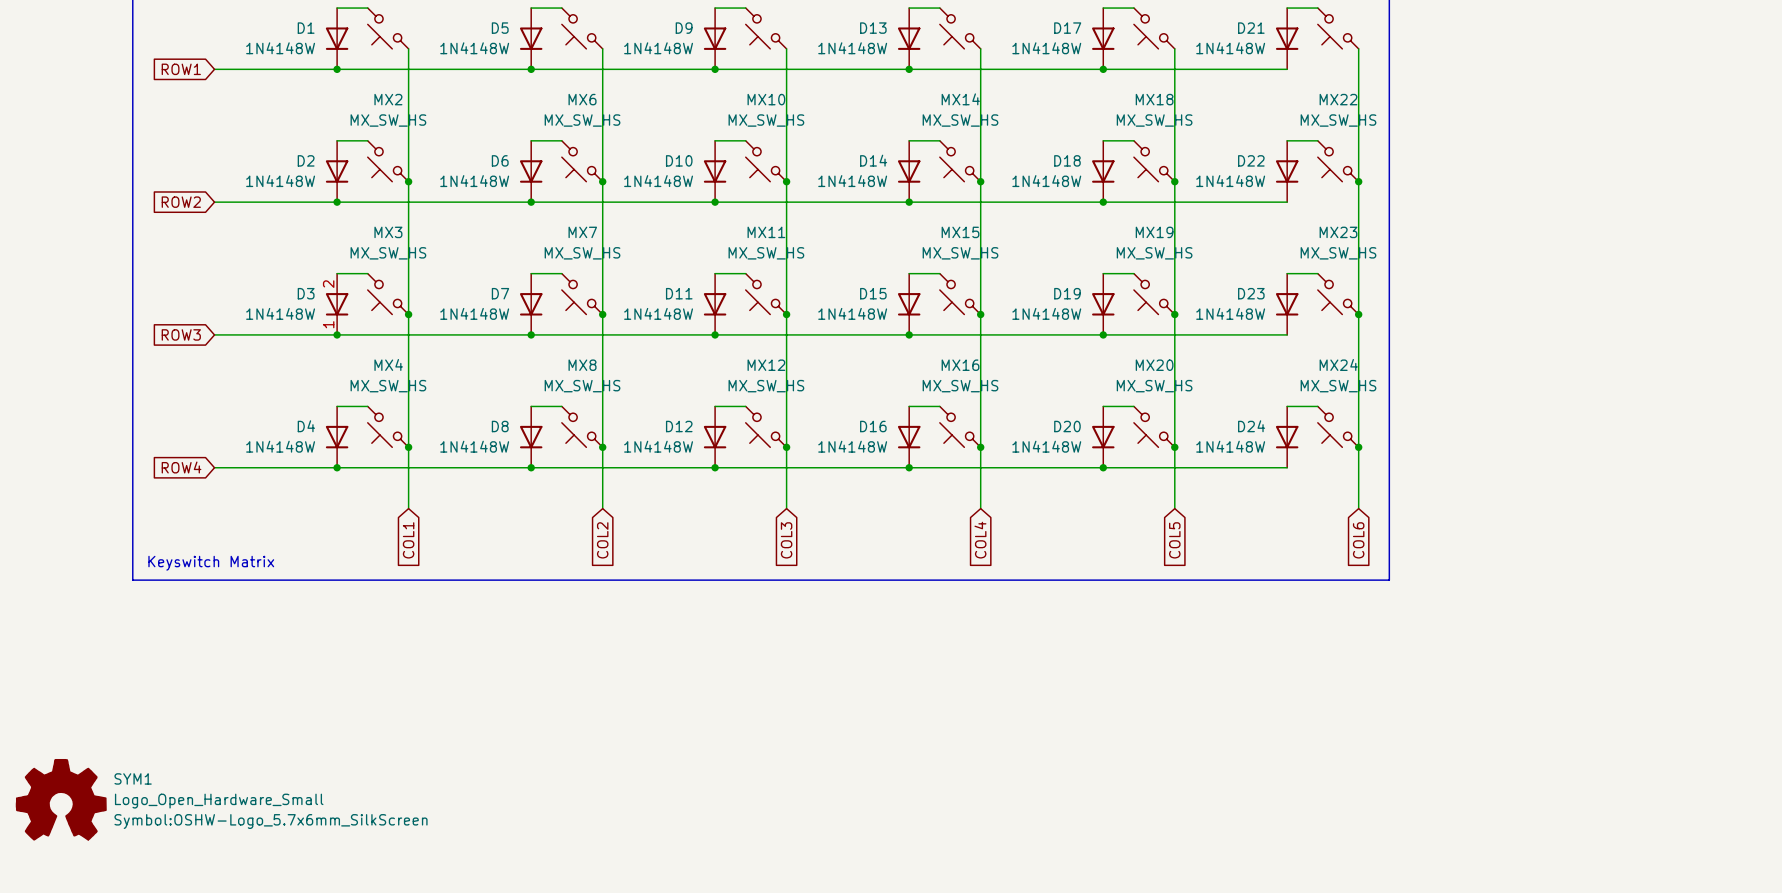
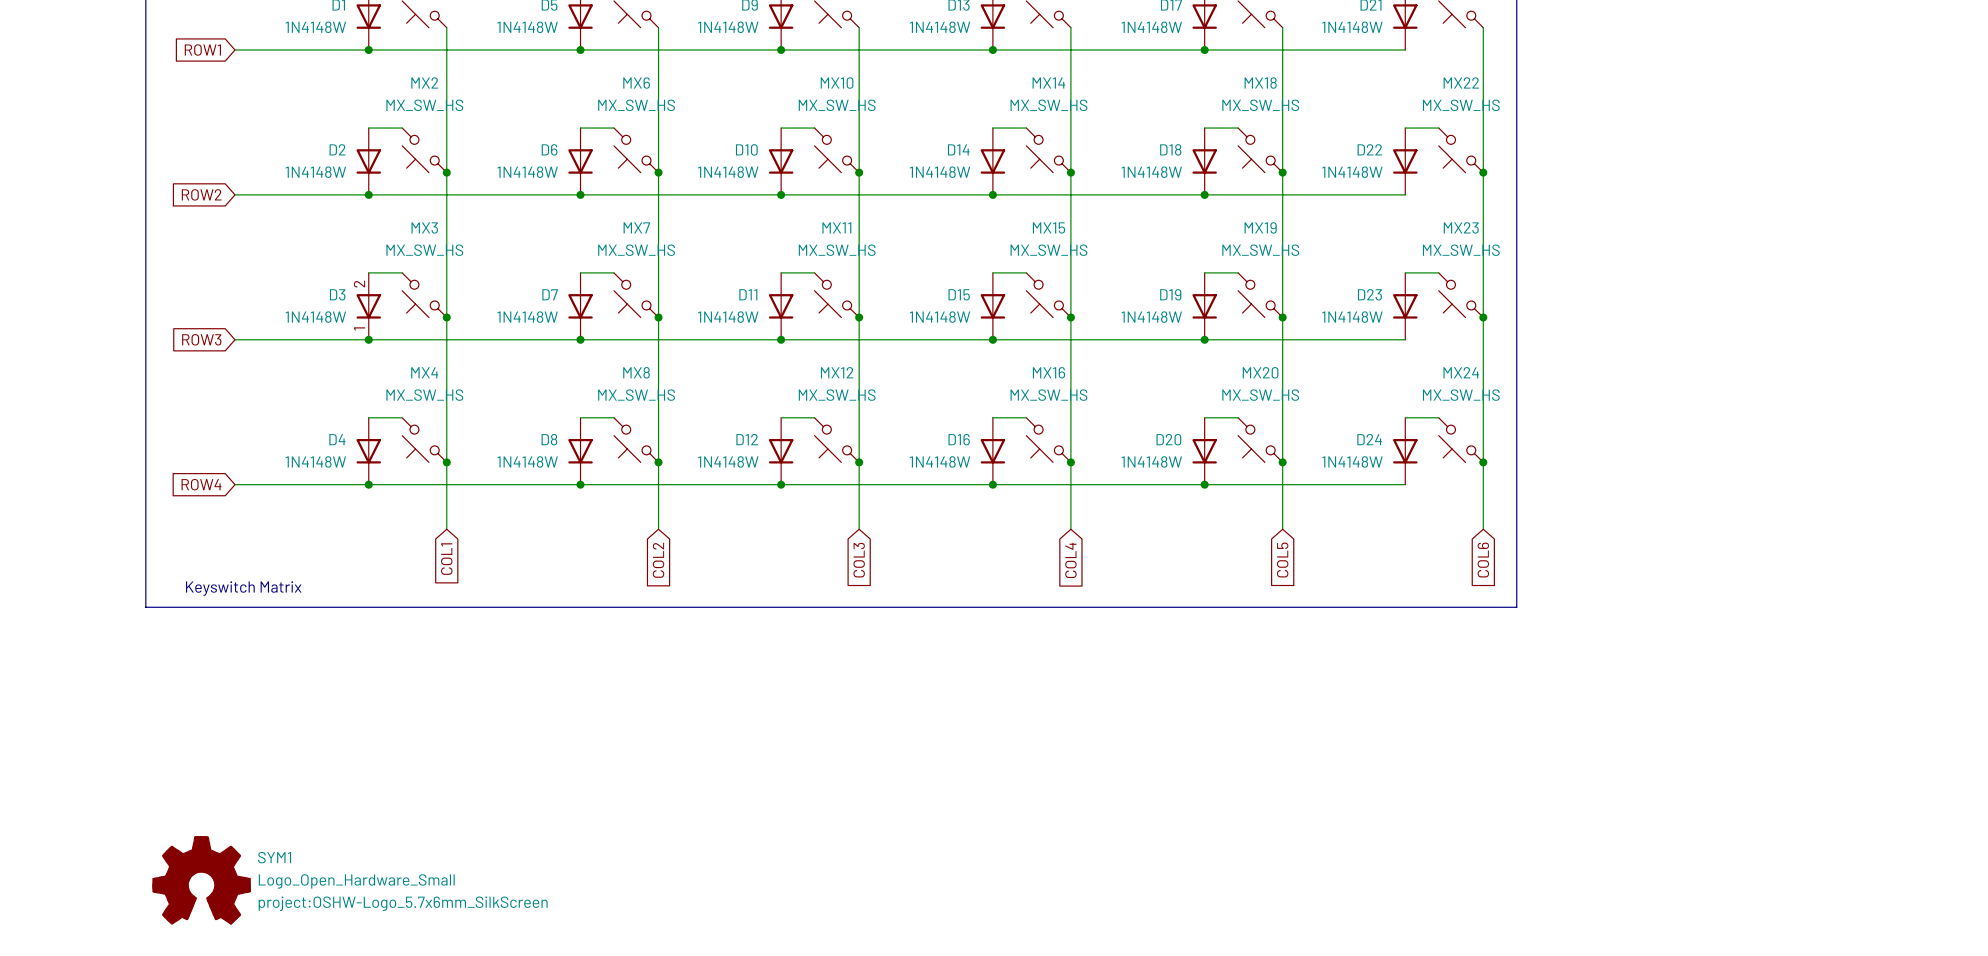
SYM1 position: (61, 799) -> (201, 880)
SYM1 text: Symbol:OSHW-Logo_5.7x6mm_SilkScreen (271, 821) -> project:OSHW-Logo_5.7x6mm_SilkScreen (403, 903)

